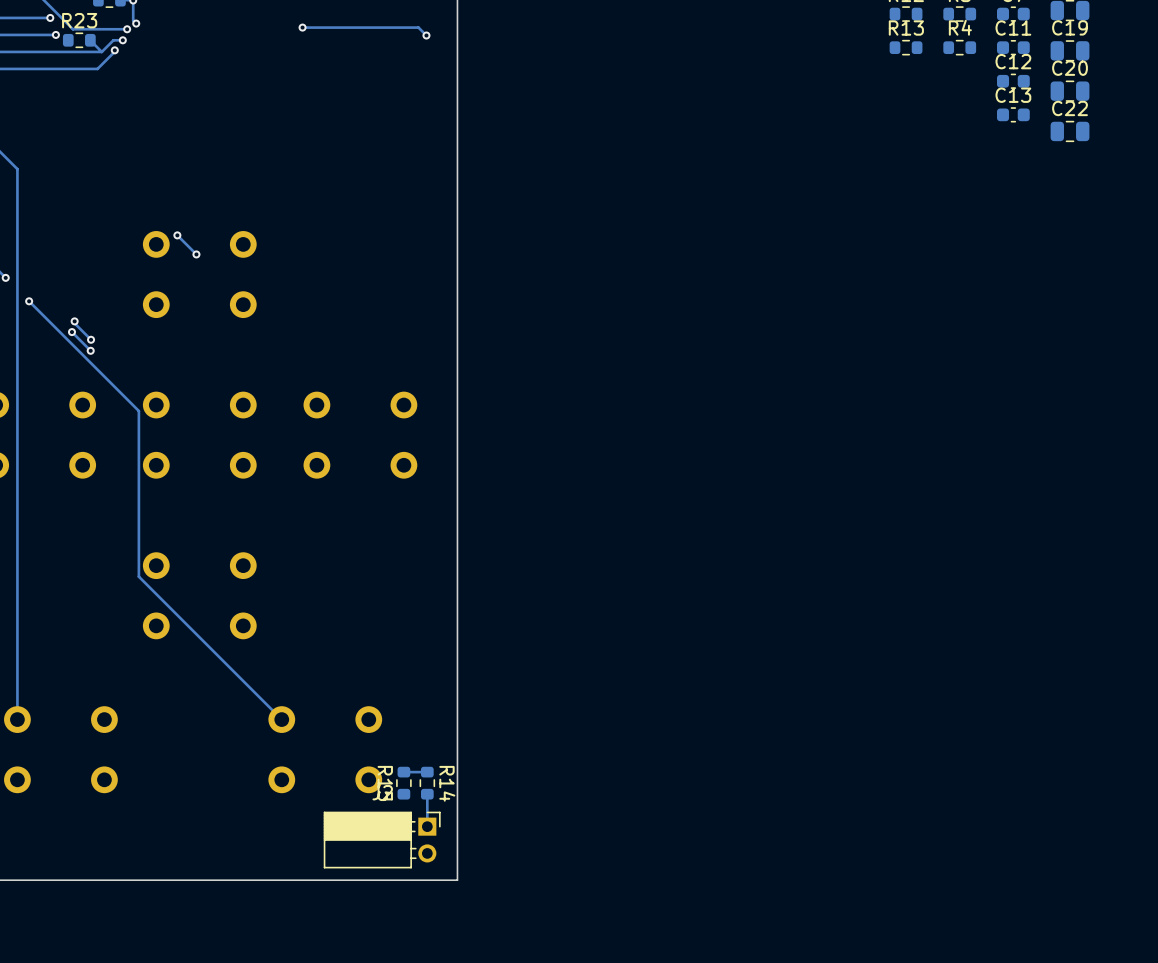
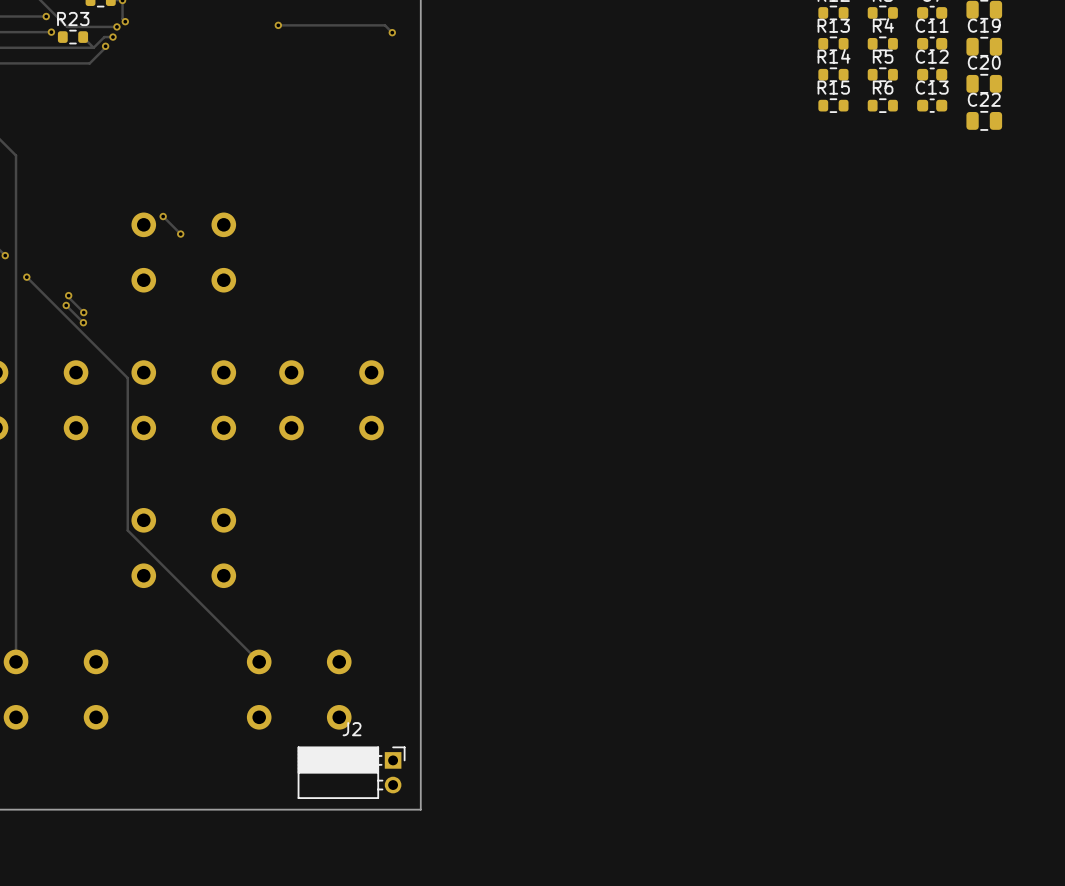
R5: none -> (882, 74)
R6: none -> (882, 105)
track: (427, 772) (403, 772) -> none
R15 rotation: 0° (403, 783) -> 90° clockwise (833, 105)
R15 position: (403, 783) -> (833, 105)
R14 rotation: 0° (427, 783) -> 90° clockwise (833, 74)
R14 position: (427, 783) -> (833, 74)
R14 name position: R14 (447, 783) -> R14 (834, 56)
track: (427, 794) (427, 826) -> none

